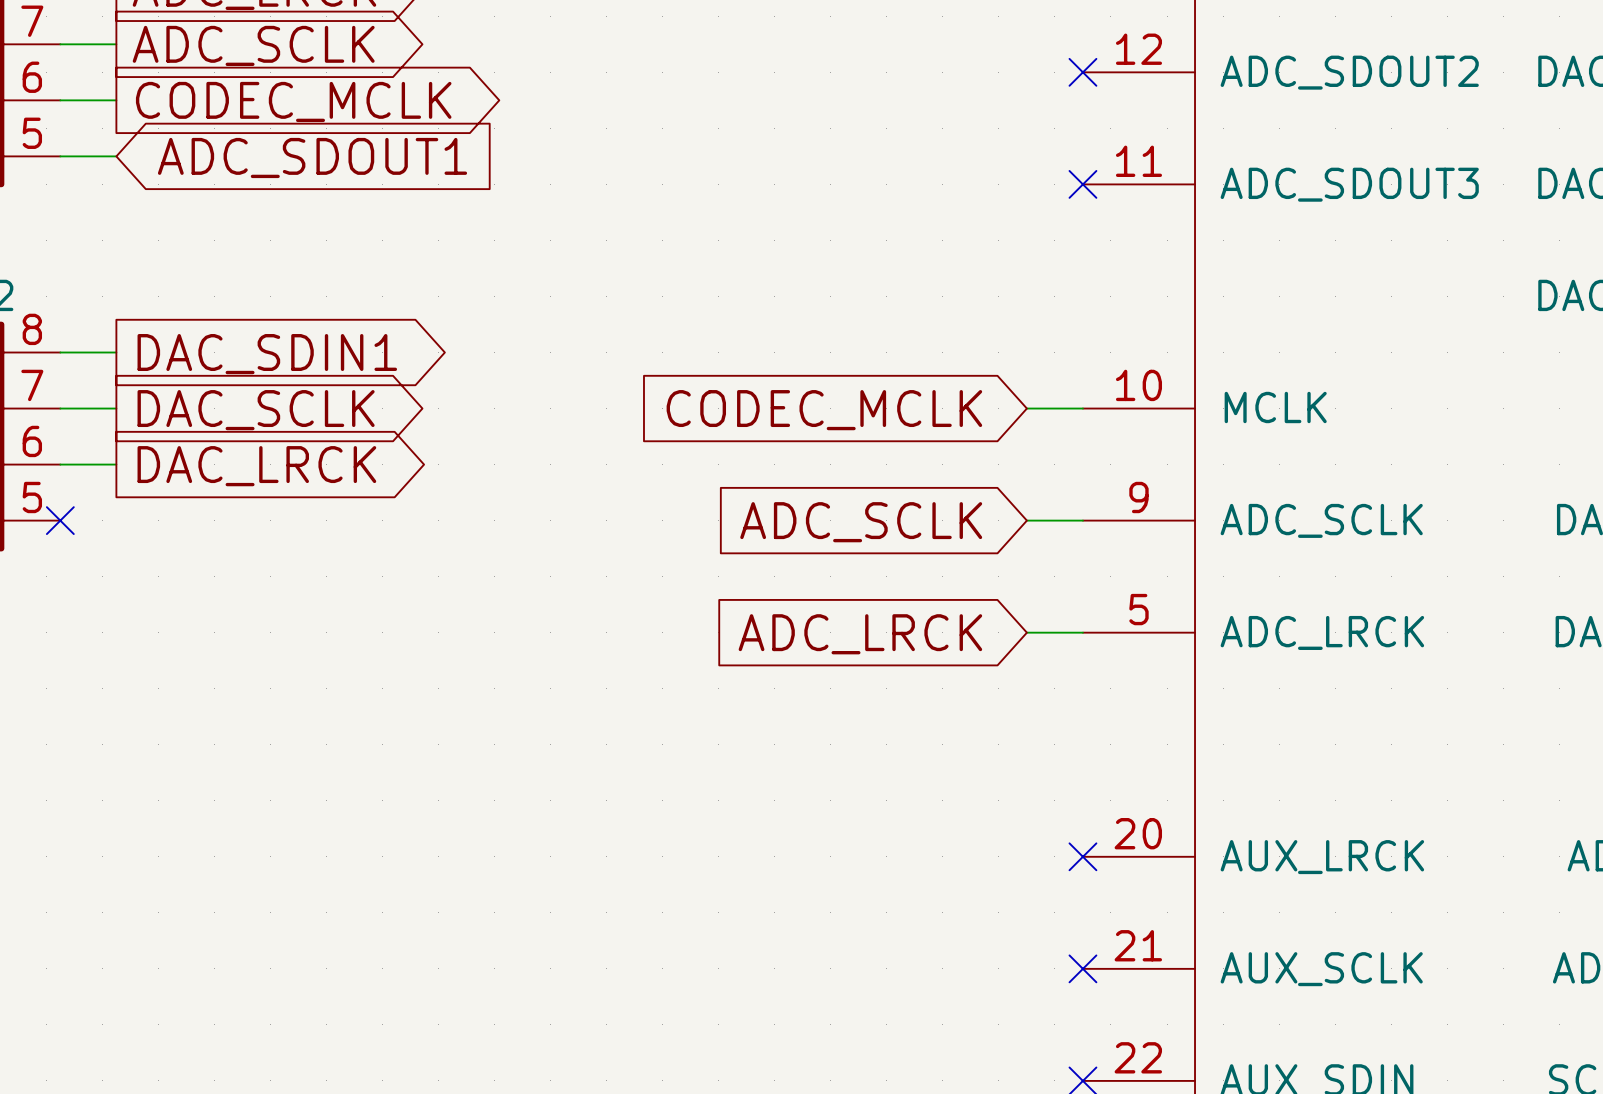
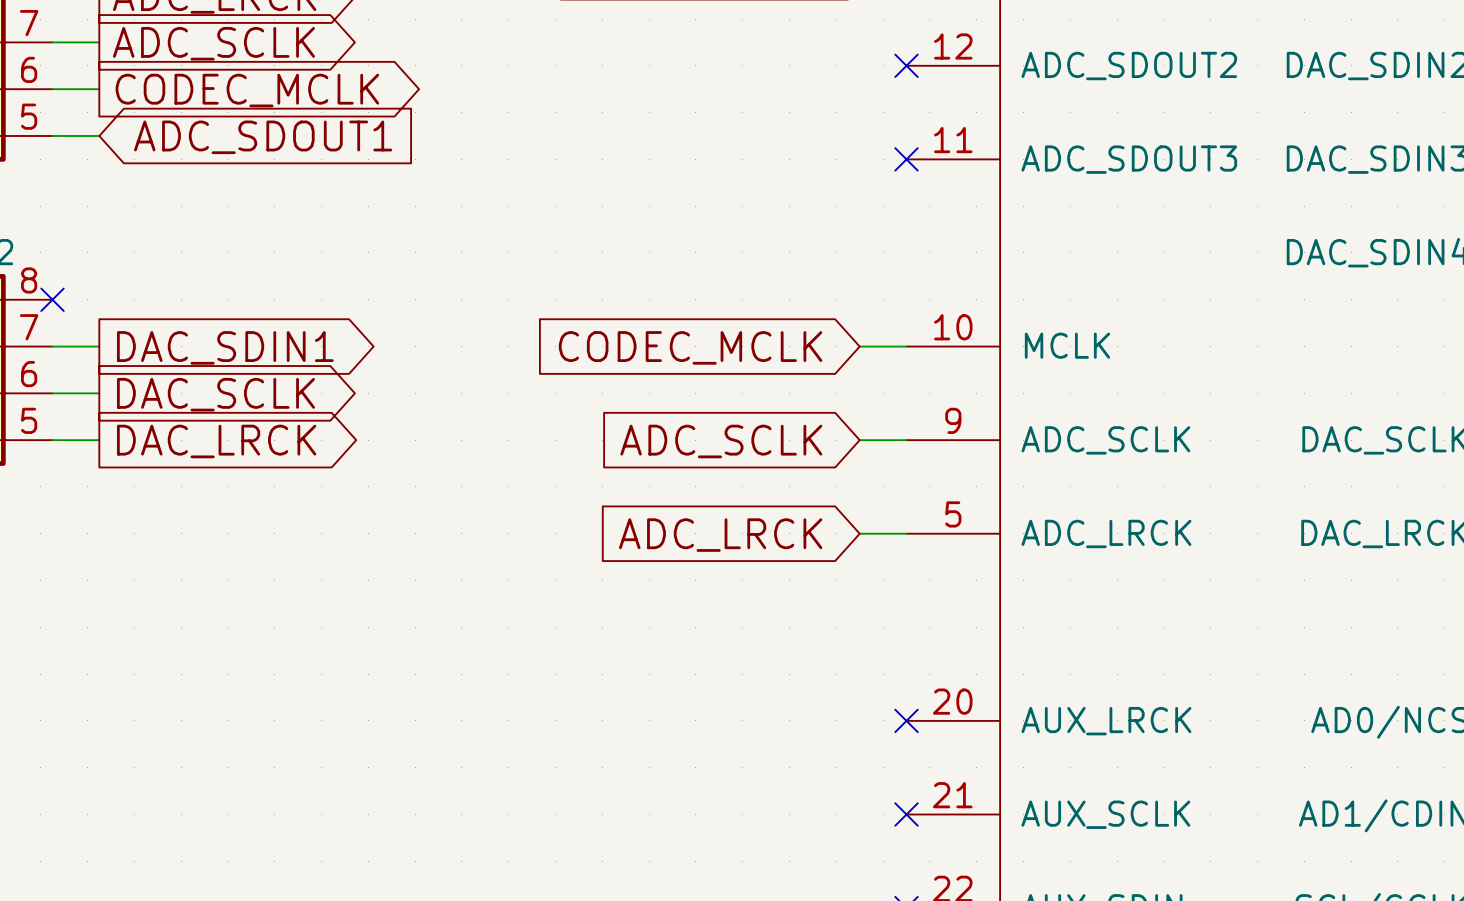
wire: (60, 352) (116, 352) -> (52, 440) (99, 440)
no-connect mark: none -> (52, 299)
global label: DAC_SDIN1 (267, 354) -> none
global label: DAC_SCLK (256, 410) -> DAC_SDIN1 (225, 347)
global label: DAC_LRCK (256, 466) -> DAC_SCLK (215, 394)
no-connect mark: (60, 520) -> none
global label: none -> DAC_LRCK (216, 441)

